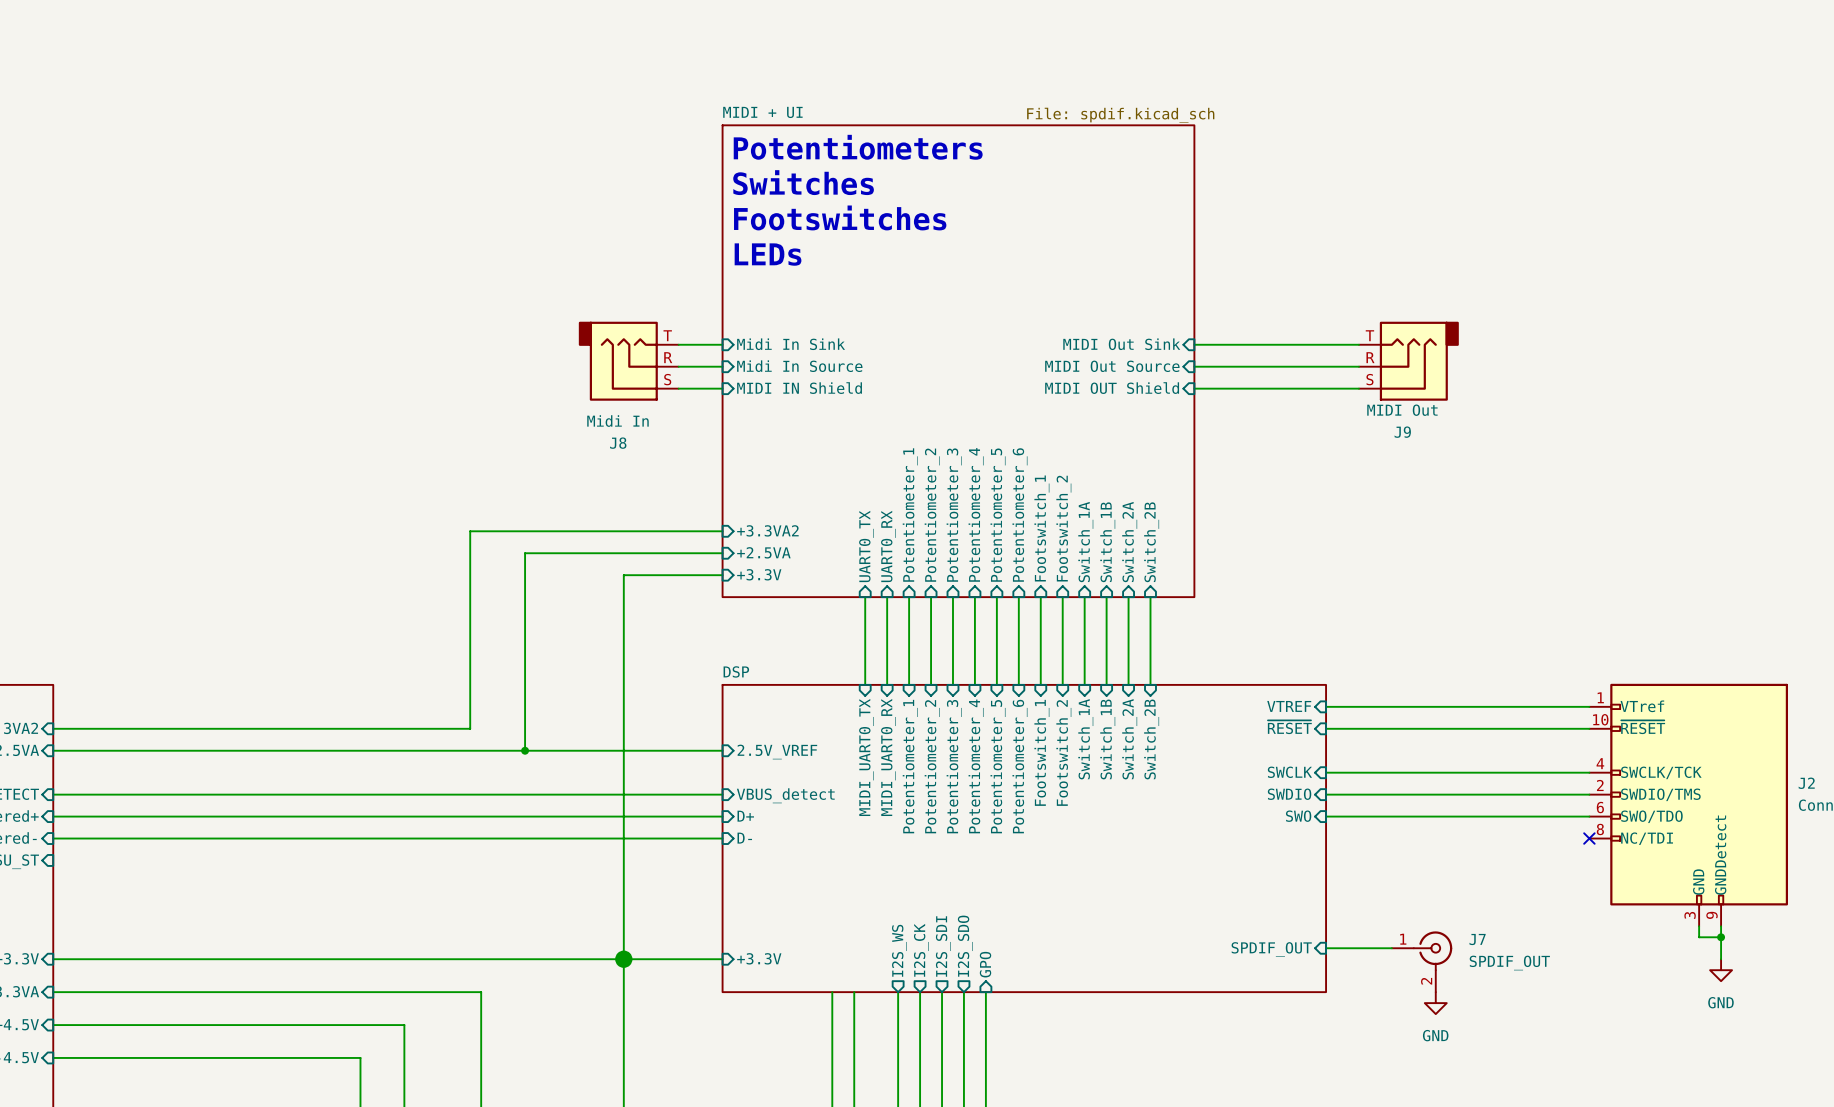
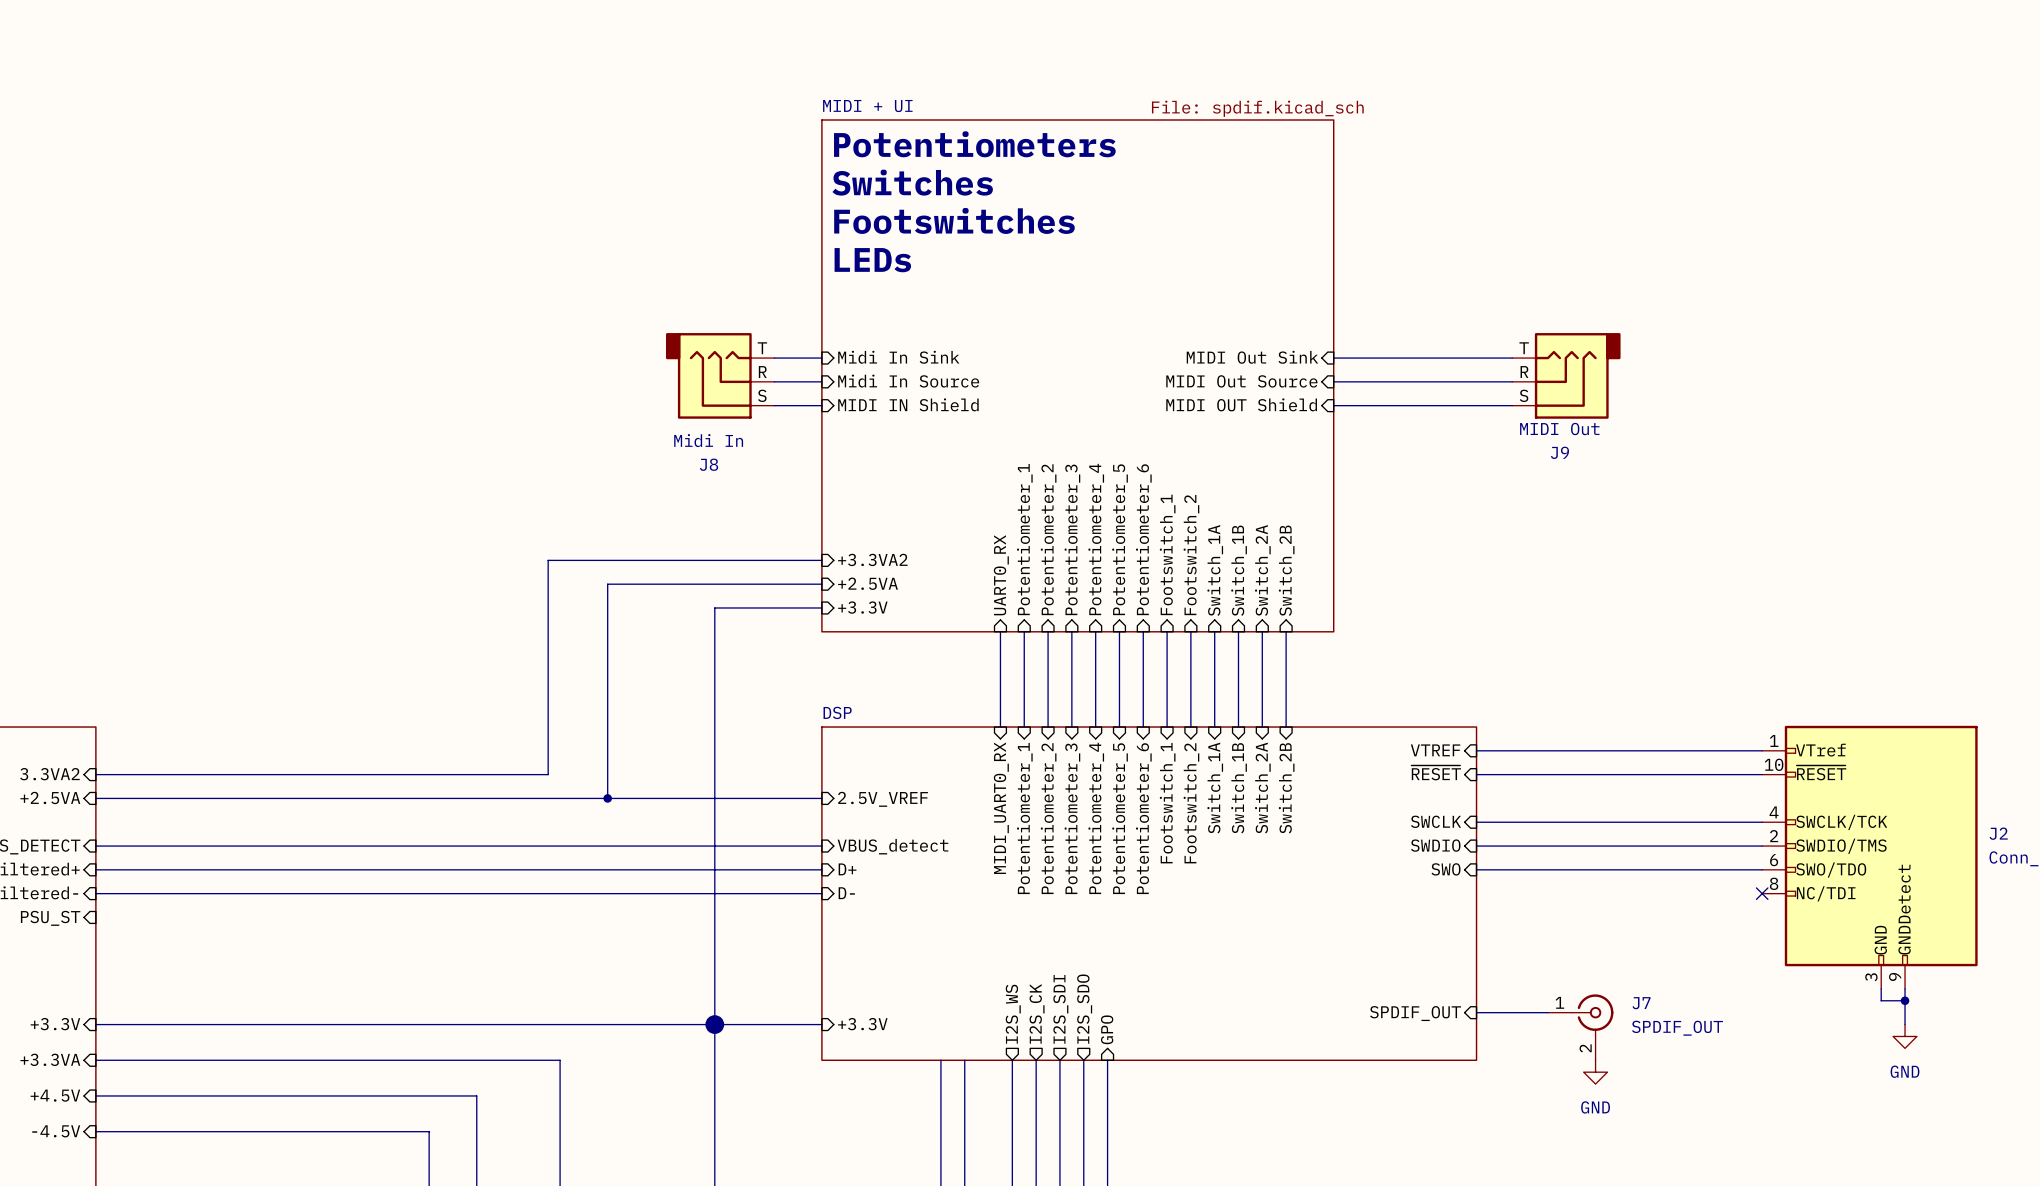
sheet pin: UART0_TX (866, 546) -> none
wire: (865, 597) (865, 684) -> none
sheet pin: MIDI_UART0_TX (866, 757) -> none

